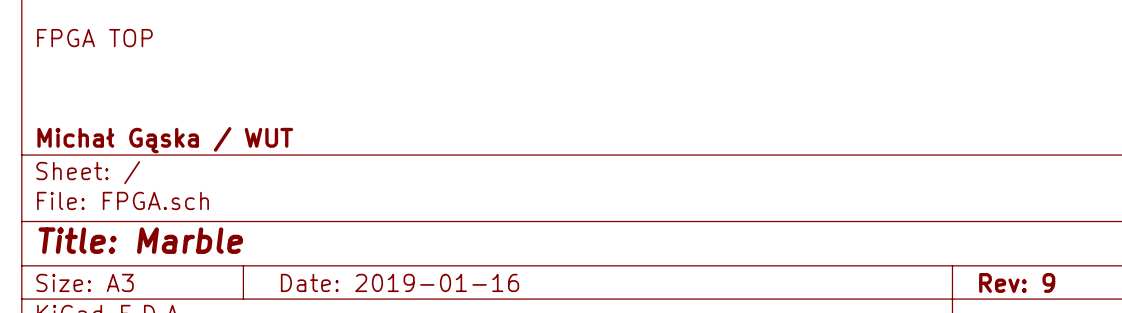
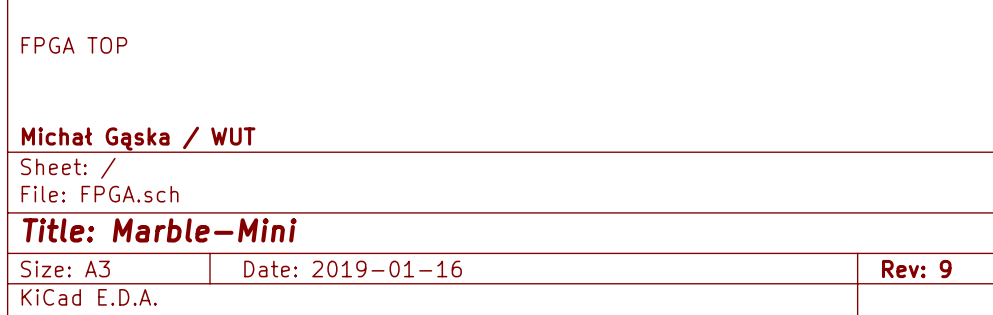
title block: Title: Marble (140, 240) -> Title: Marble-Mini (159, 230)

